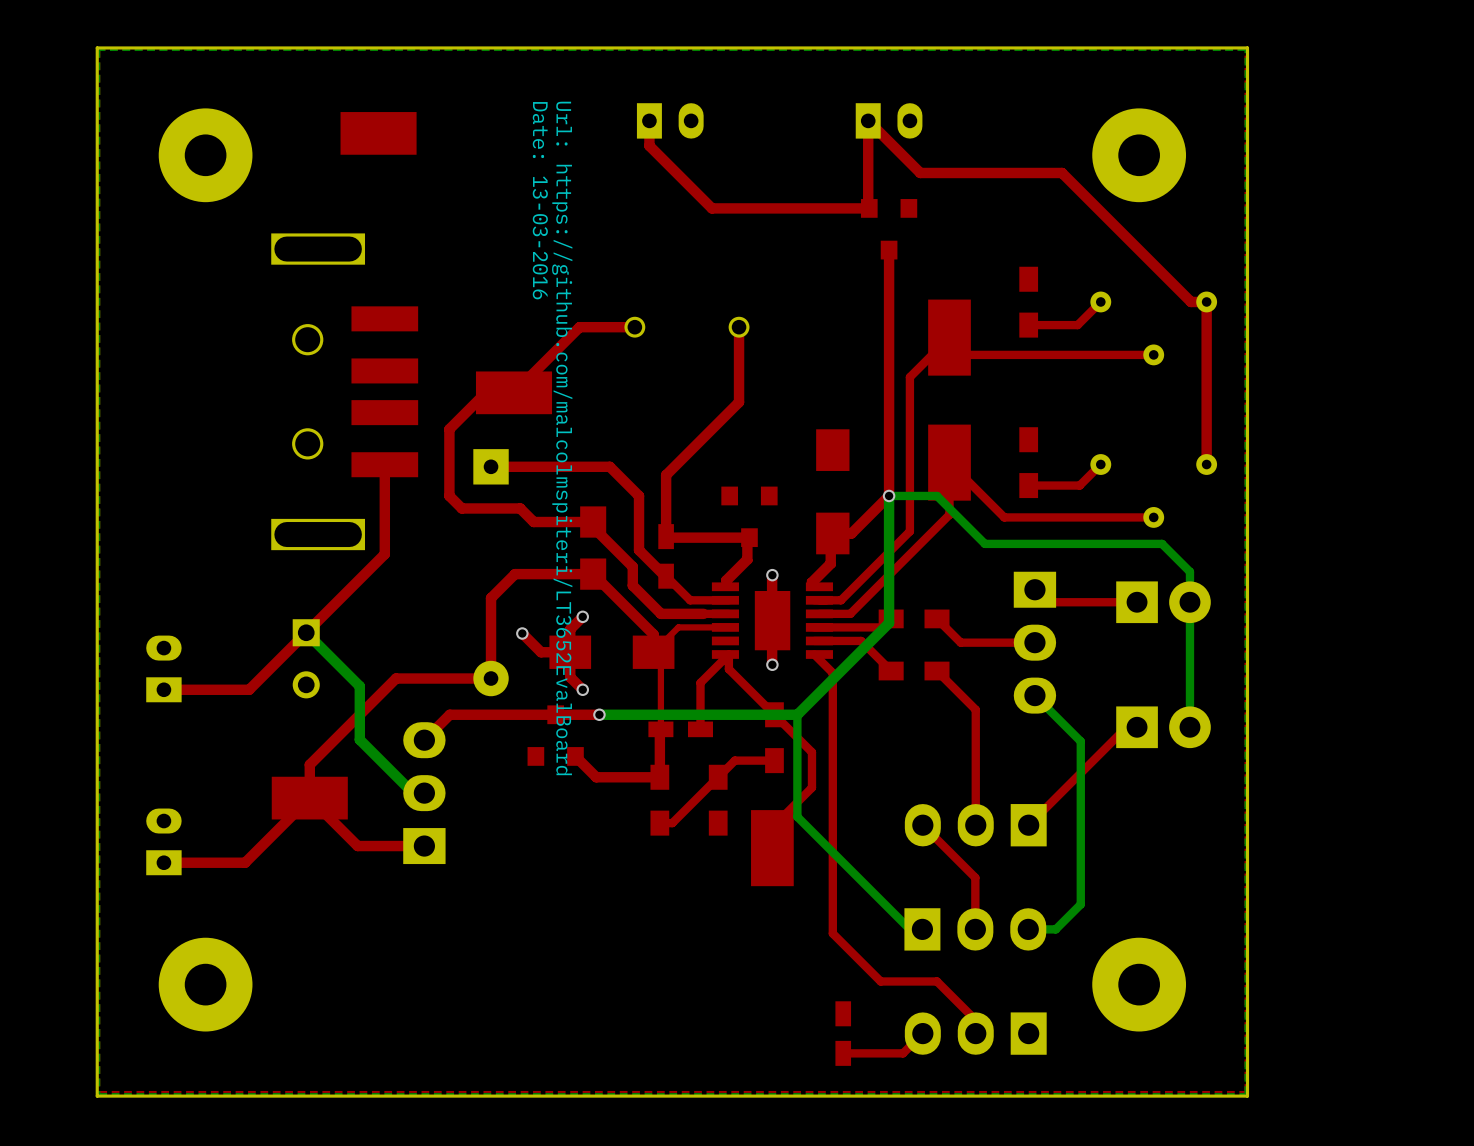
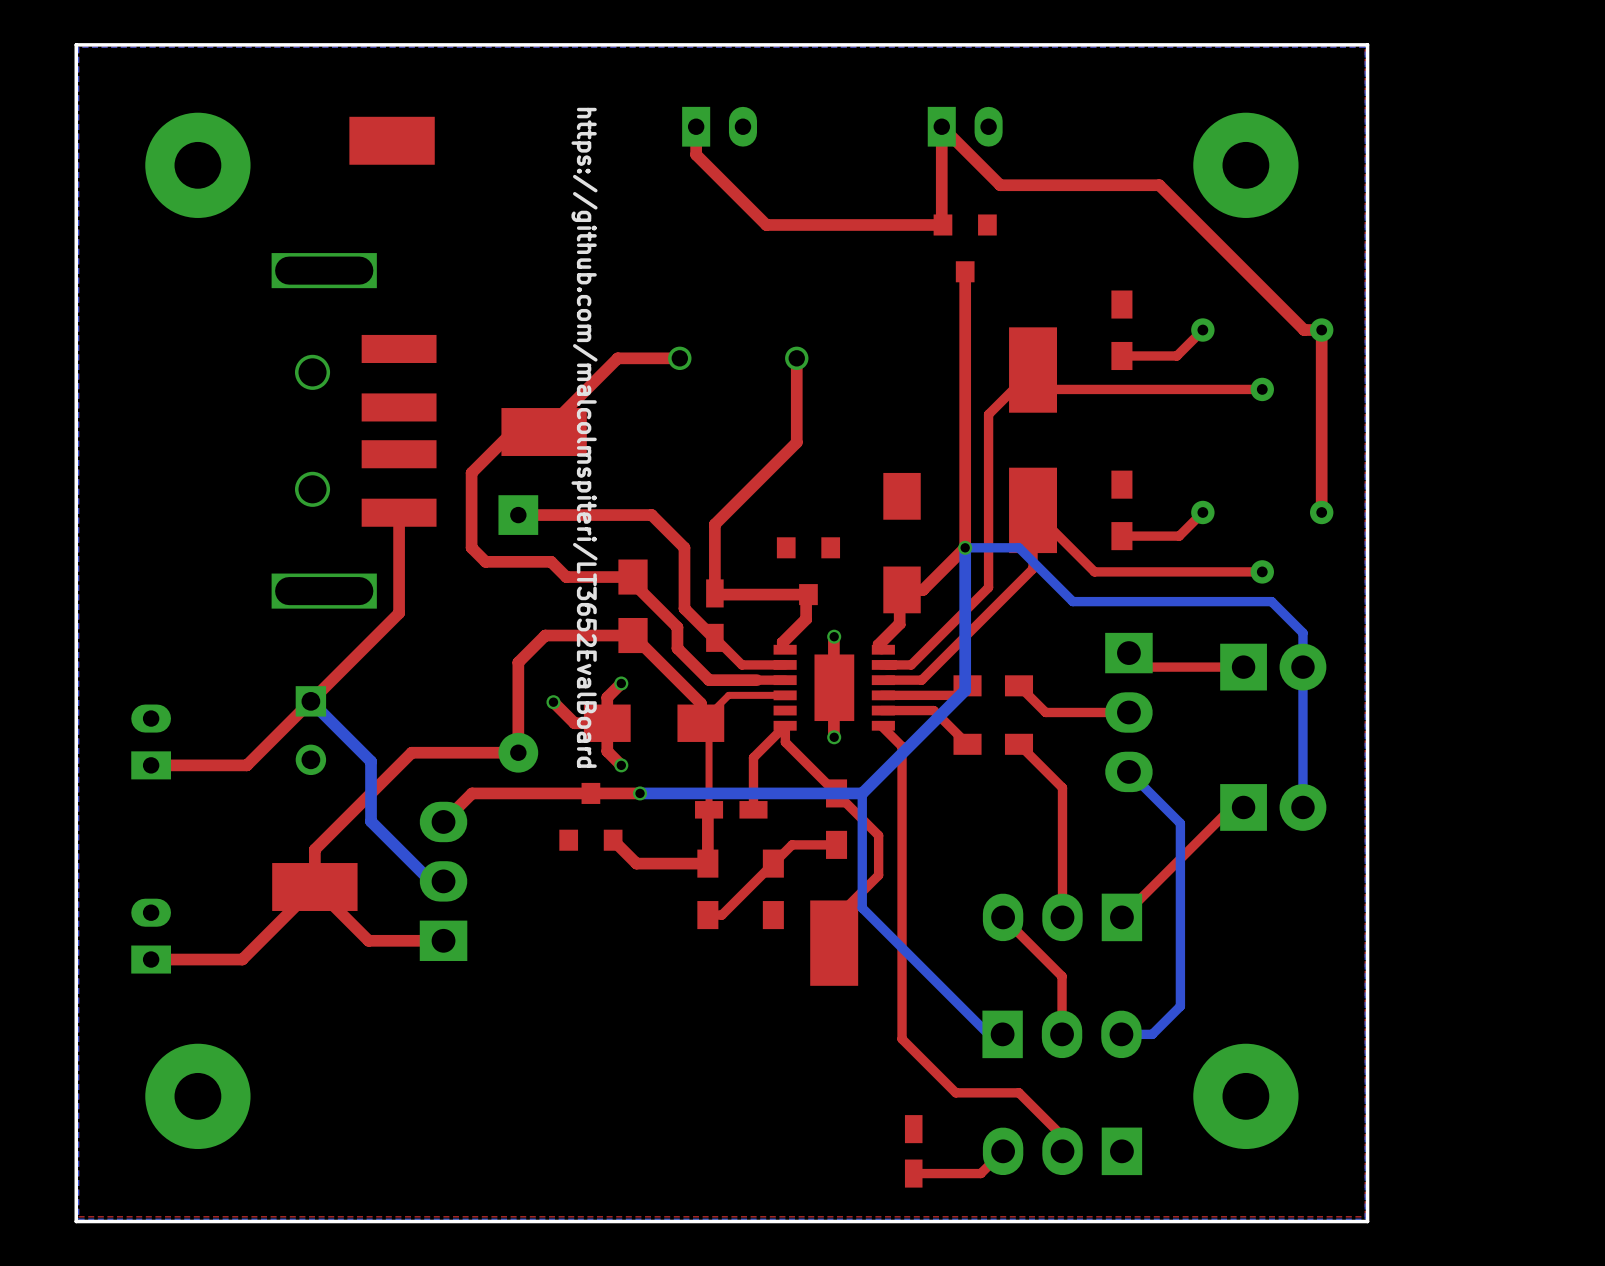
text: Date: 13-03-2016 (540, 200) -> none
text: Url: https://github.com/malcolmspiteri/LT3652EvalBoard (562, 438) -> https://github.com/malcolmspiteri/LT3652EvalBoard (584, 437)
part footprint: [711, 582, 833, 659] -> [773, 644, 895, 731]

